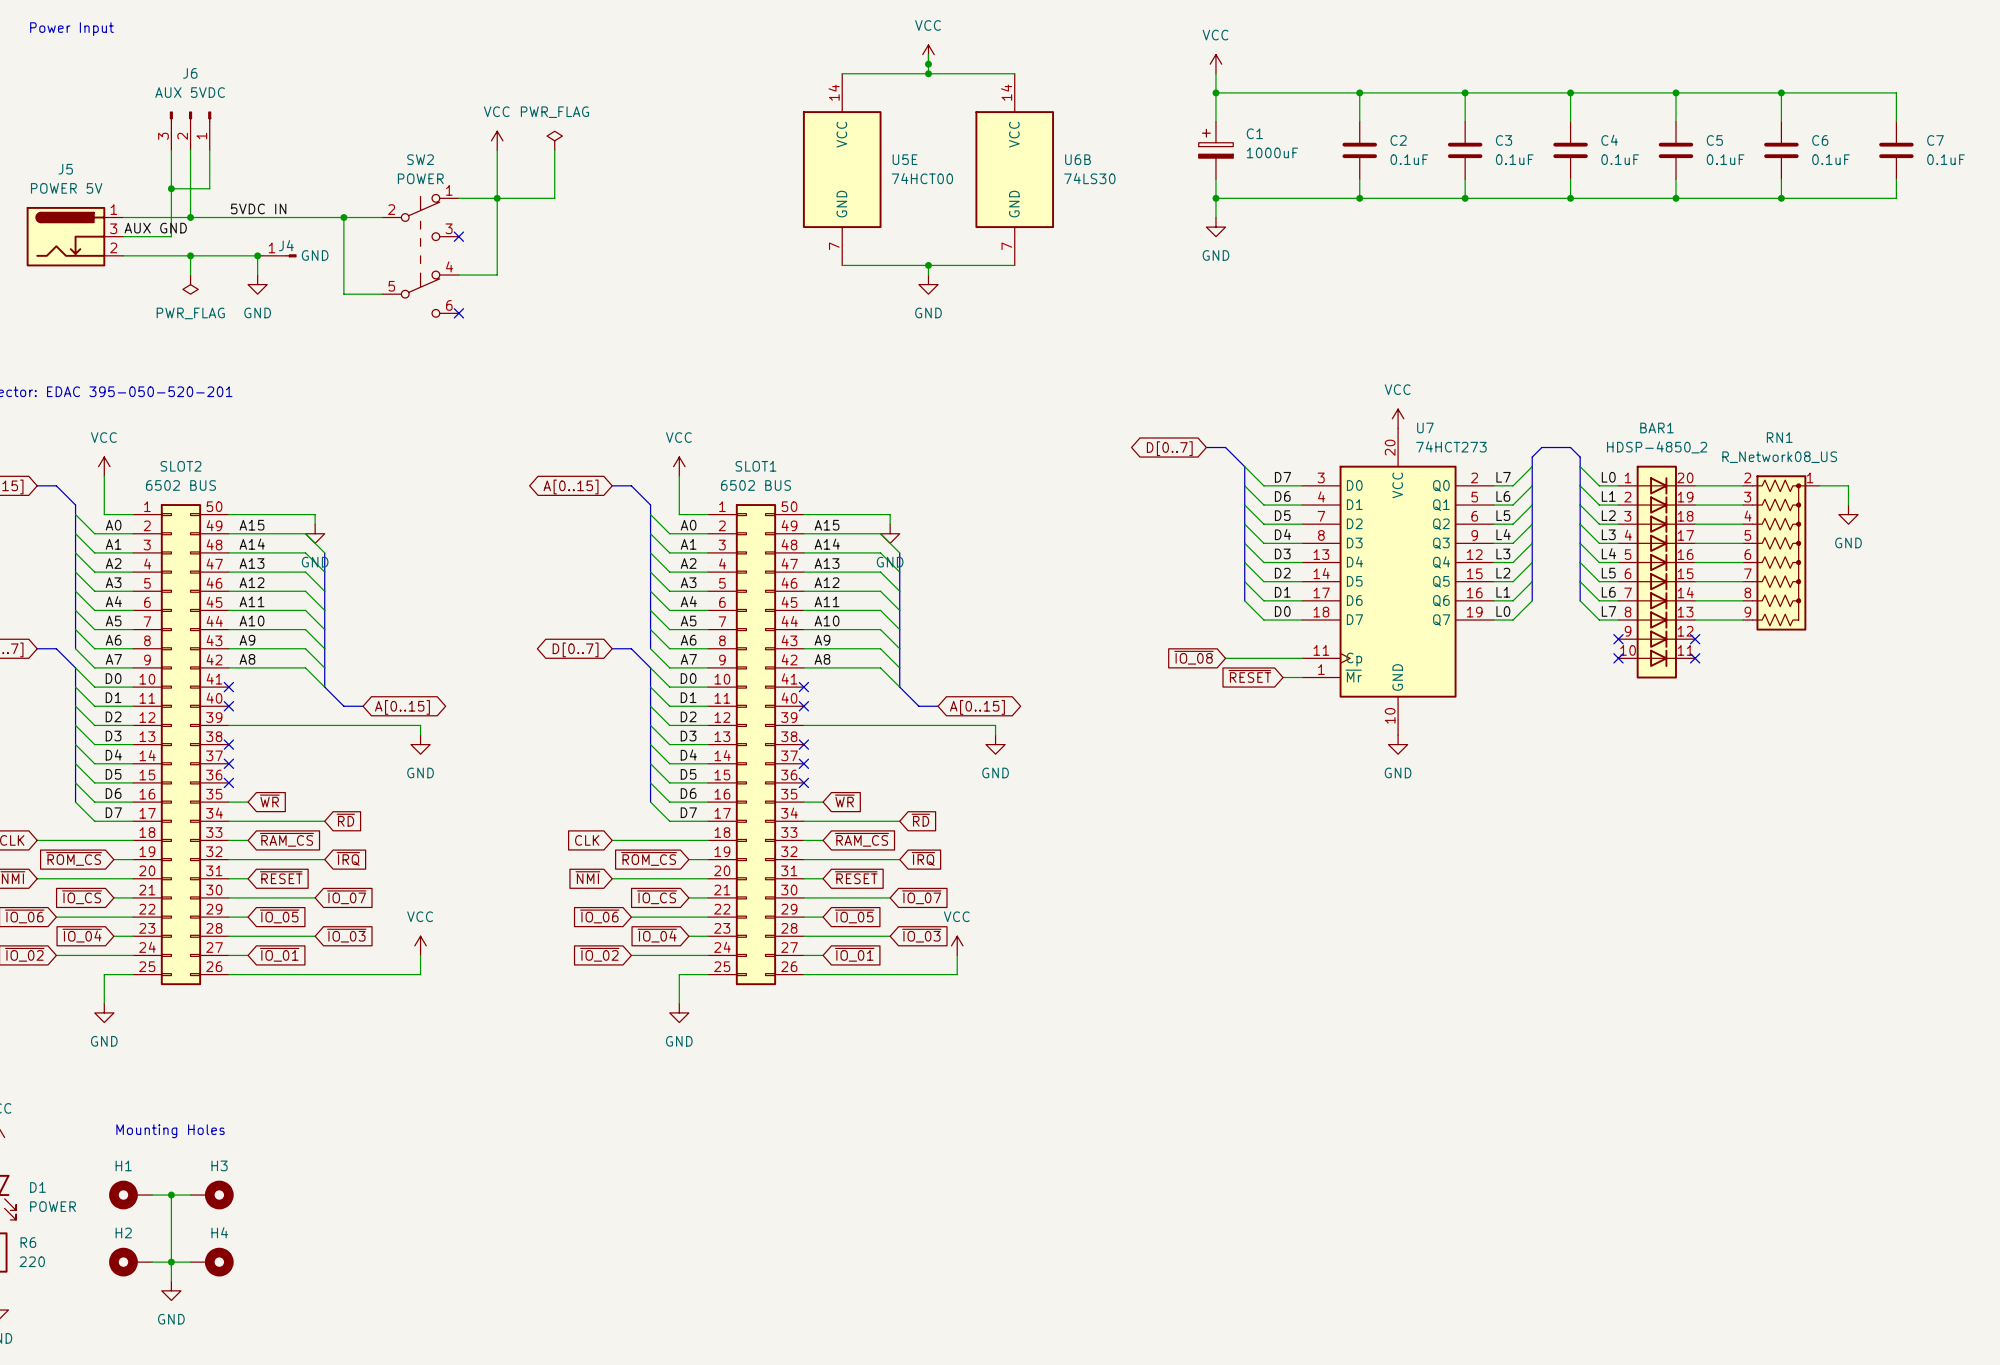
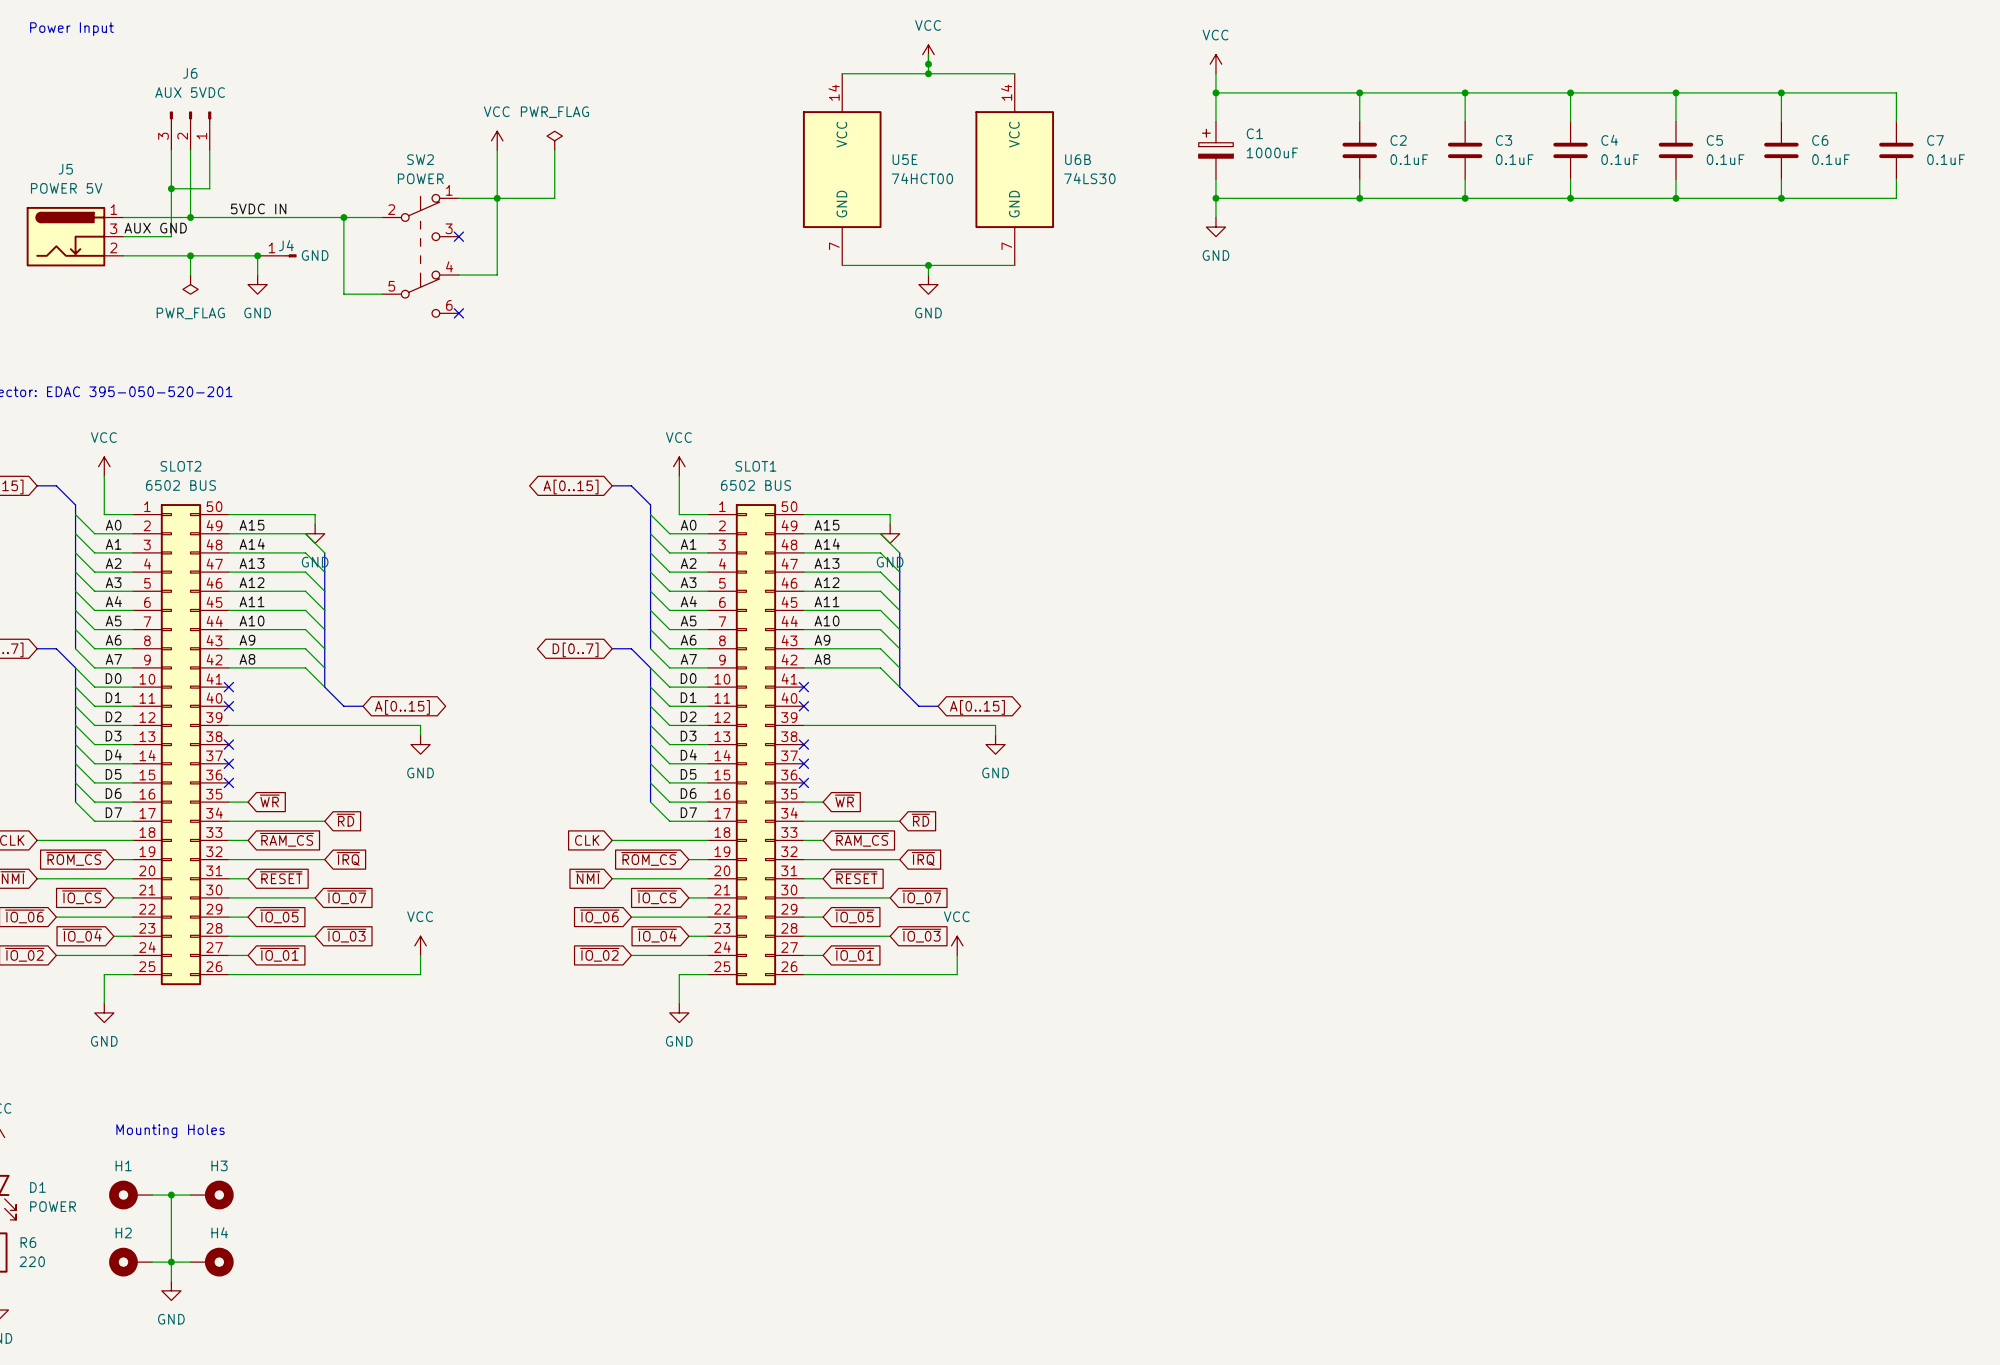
power symbol: VCC (1398, 418) -> none
bus: (1206, 447) (1225, 447) (1244, 466) (1244, 600) -> none
global label: D[0..7] (1169, 448) -> none
wire: (1244, 466) (1263, 485) (1302, 485) -> none
wire: (1532, 466) (1513, 485) (1493, 485) -> none
wire: (1580, 466) (1599, 485) (1618, 485) -> none
label: D7 (1282, 477) -> none
label: L7 (1503, 477) -> none
label: L0 (1608, 477) -> none
wire: (1244, 485) (1263, 505) (1302, 505) -> none
wire: (1532, 485) (1513, 505) (1493, 505) -> none
wire: (1580, 485) (1599, 505) (1618, 505) -> none
wire: (1695, 485) (1743, 485) -> none
wire: (1819, 485) (1848, 485) (1848, 505) -> none
label: D6 (1282, 496) -> none
label: L6 (1503, 496) -> none
label: L1 (1608, 496) -> none
wire: (1244, 505) (1263, 524) (1302, 524) -> none
wire: (1532, 505) (1513, 524) (1493, 524) -> none
wire: (1580, 505) (1599, 524) (1618, 524) -> none
wire: (1695, 505) (1743, 505) -> none
power symbol: GND (1848, 514) -> none
label: D5 (1282, 515) -> none
label: L5 (1503, 515) -> none
label: L2 (1608, 515) -> none
wire: (1244, 524) (1263, 543) (1302, 543) -> none
wire: (1532, 524) (1513, 543) (1493, 543) -> none
wire: (1580, 524) (1599, 543) (1618, 543) -> none
wire: (1695, 524) (1743, 524) -> none
label: D4 (1282, 534) -> none
label: L4 (1503, 534) -> none
label: L3 (1608, 534) -> none
wire: (1244, 543) (1263, 562) (1302, 562) -> none
wire: (1532, 543) (1513, 562) (1493, 562) -> none
wire: (1580, 543) (1599, 562) (1618, 562) -> none
wire: (1695, 543) (1743, 543) -> none
RN1: R_Network08_US (1781, 552) -> none
label: D3 (1282, 553) -> none
label: L3 (1503, 553) -> none
label: L4 (1608, 553) -> none
wire: (1244, 562) (1263, 581) (1302, 581) -> none
wire: (1532, 562) (1513, 581) (1493, 581) -> none
wire: (1580, 562) (1599, 581) (1618, 581) -> none
wire: (1695, 562) (1743, 562) -> none
BAR1: HDSP-4850_2 (1656, 572) -> none
label: D2 (1282, 573) -> none
label: L2 (1503, 573) -> none
label: L5 (1608, 573) -> none
wire: (1244, 581) (1263, 600) (1302, 600) -> none
U7: 74HCT273 (1398, 581) -> none
wire: (1532, 581) (1513, 600) (1493, 600) -> none
wire: (1580, 581) (1599, 600) (1618, 600) -> none
wire: (1695, 581) (1743, 581) -> none
label: D1 (1282, 592) -> none
label: L1 (1503, 592) -> none
label: L6 (1608, 592) -> none
wire: (1244, 600) (1263, 620) (1302, 620) -> none
wire: (1532, 600) (1513, 620) (1493, 620) -> none
bus: (1532, 600) (1532, 457) (1541, 447) (1570, 447) (1580, 457) (1580, 600) -> none
wire: (1580, 600) (1599, 620) (1618, 620) -> none
wire: (1695, 600) (1743, 600) -> none
label: D0 (1282, 611) -> none
label: L0 (1503, 611) -> none
label: L7 (1608, 611) -> none
wire: (1695, 620) (1743, 620) -> none
no-connect mark: (1618, 639) -> none
no-connect mark: (1695, 639) -> none
global label: ~{IO_08} (1193, 657) -> none
wire: (1225, 658) (1302, 658) -> none
no-connect mark: (1618, 658) -> none
no-connect mark: (1695, 658) -> none
global label: ~{RESET} (1249, 676) -> none
wire: (1283, 677) (1302, 677) -> none
power symbol: GND (1398, 744) -> none

